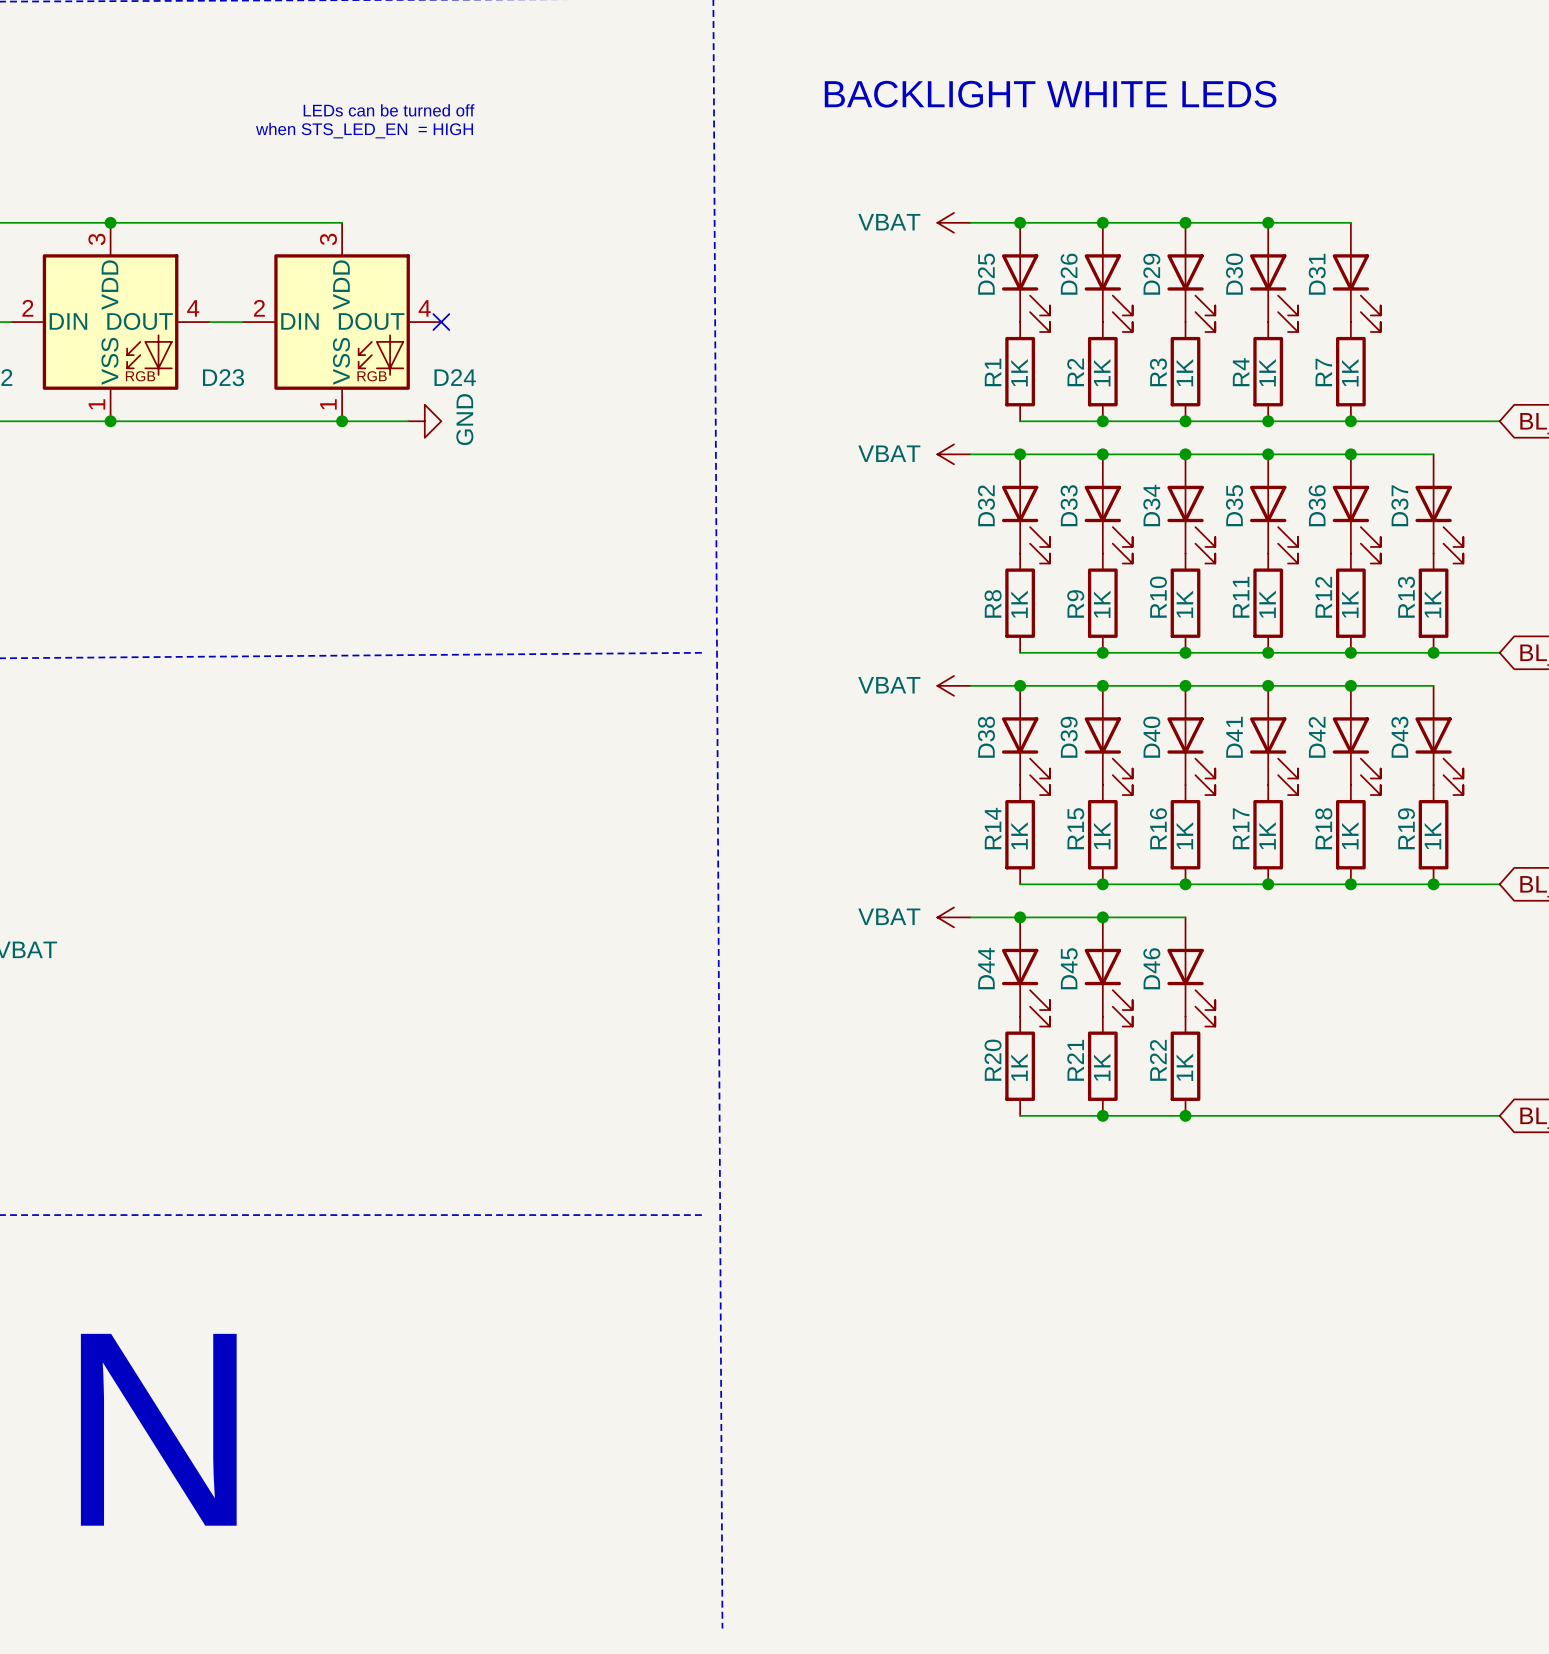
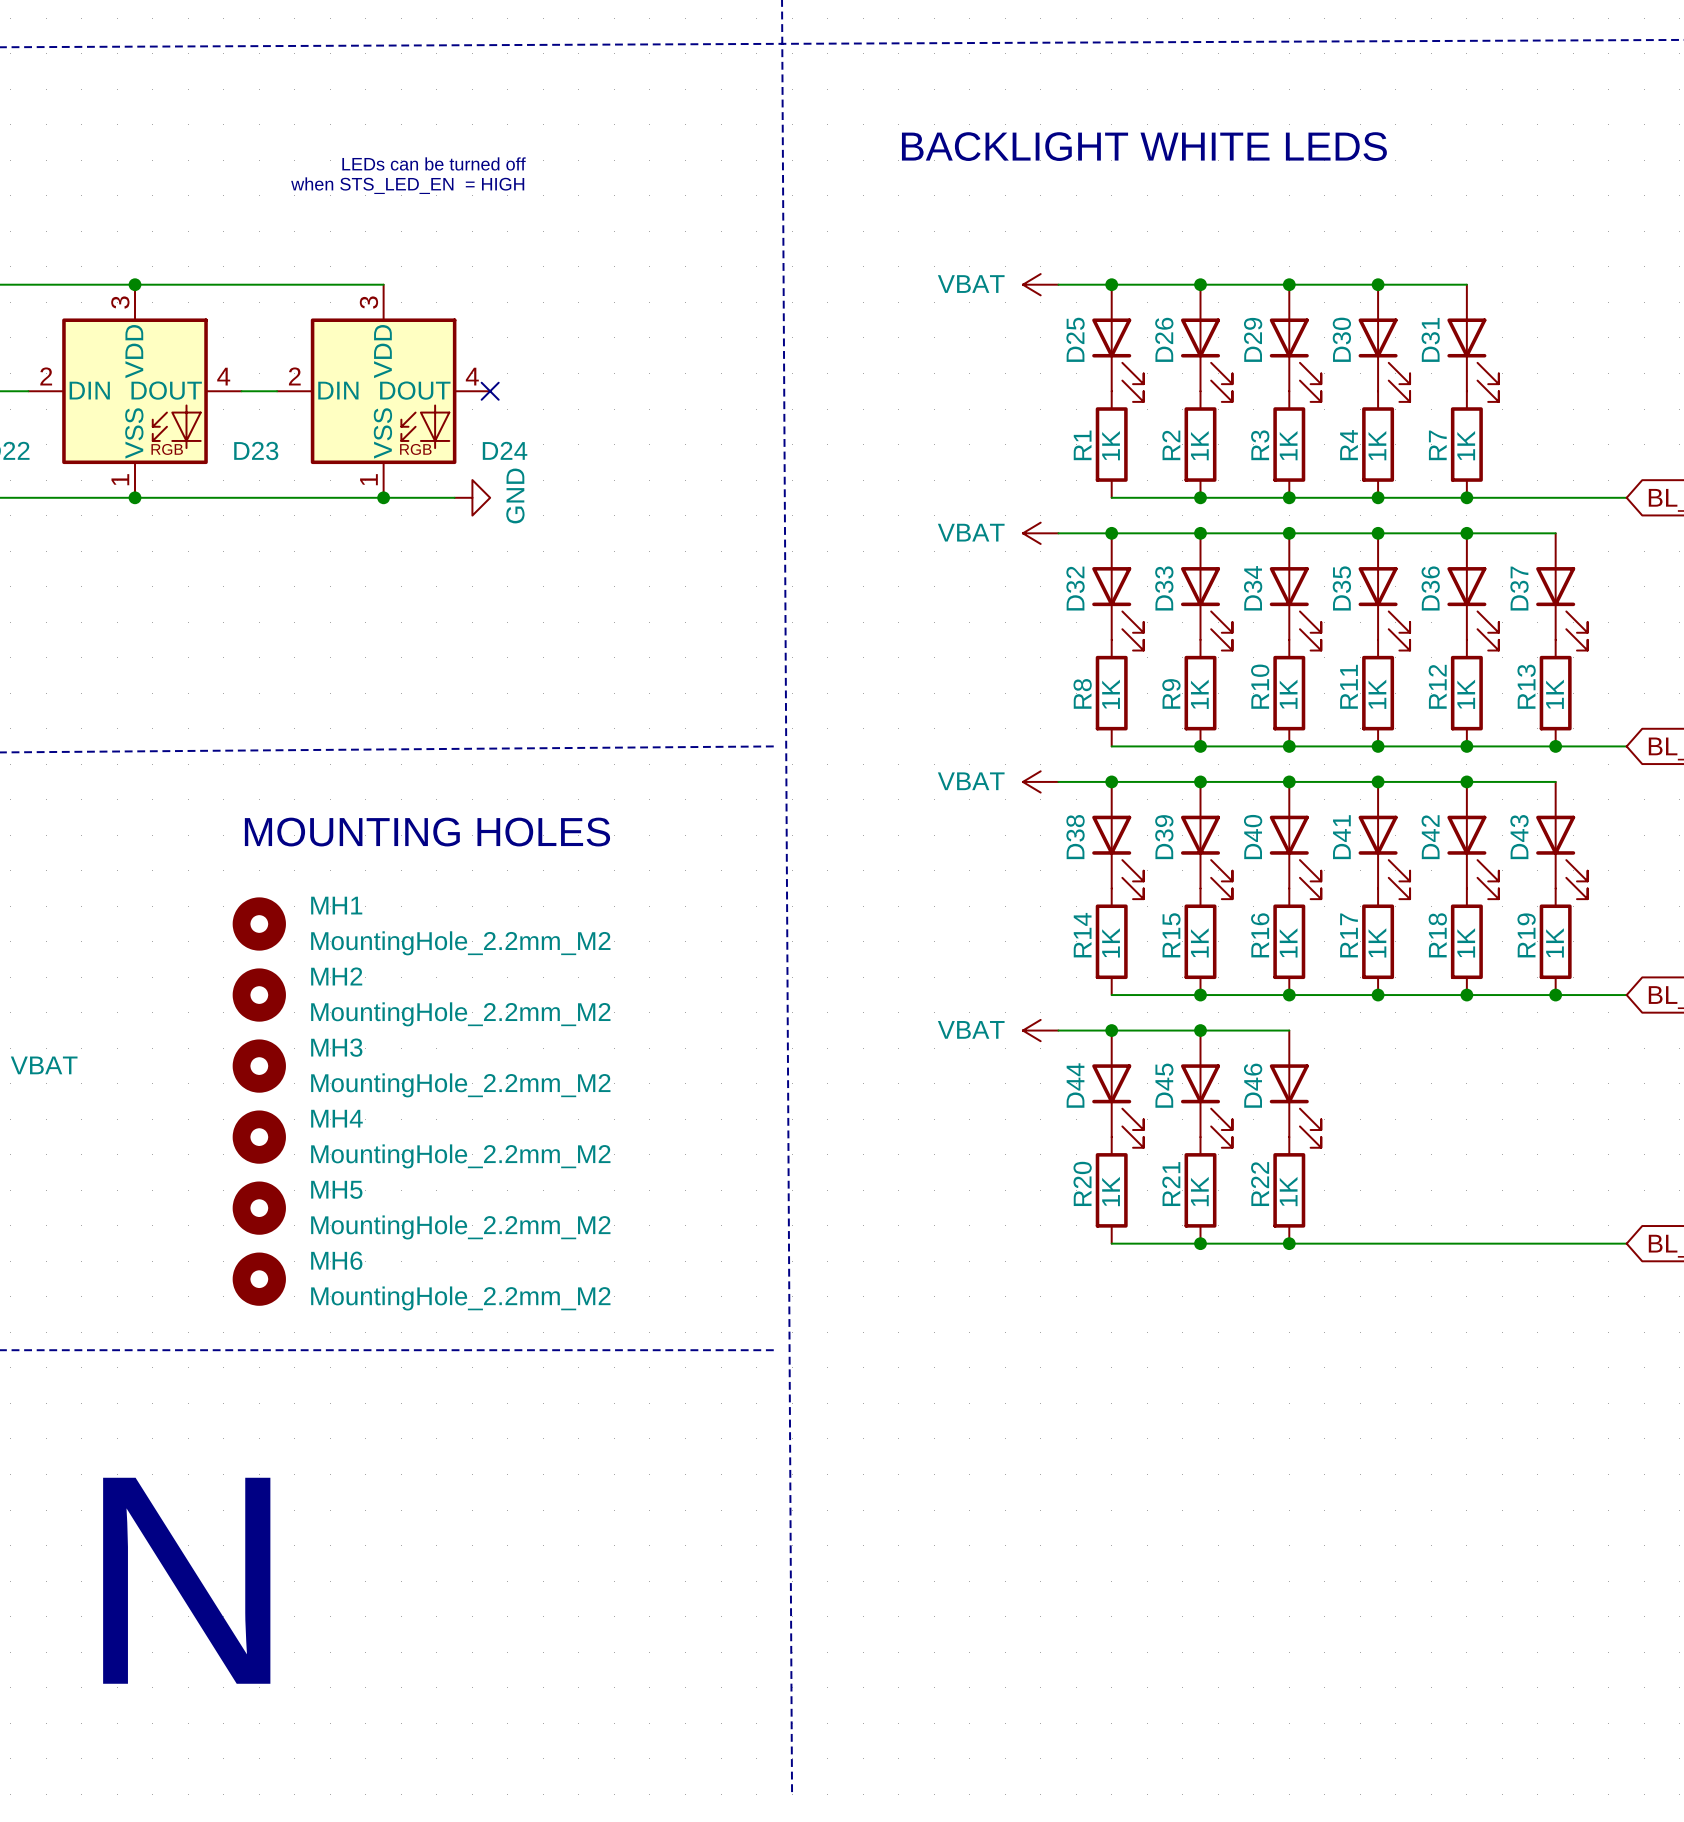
text: none -> MOUNTING HOLES (427, 832)
MH1: none -> MountingHole_2.2mm_M2 (259, 924)
MH2: none -> MountingHole_2.2mm_M2 (259, 995)
MH3: none -> MountingHole_2.2mm_M2 (259, 1066)
MH4: none -> MountingHole_2.2mm_M2 (259, 1137)
MH5: none -> MountingHole_2.2mm_M2 (259, 1208)
MH6: none -> MountingHole_2.2mm_M2 (259, 1279)

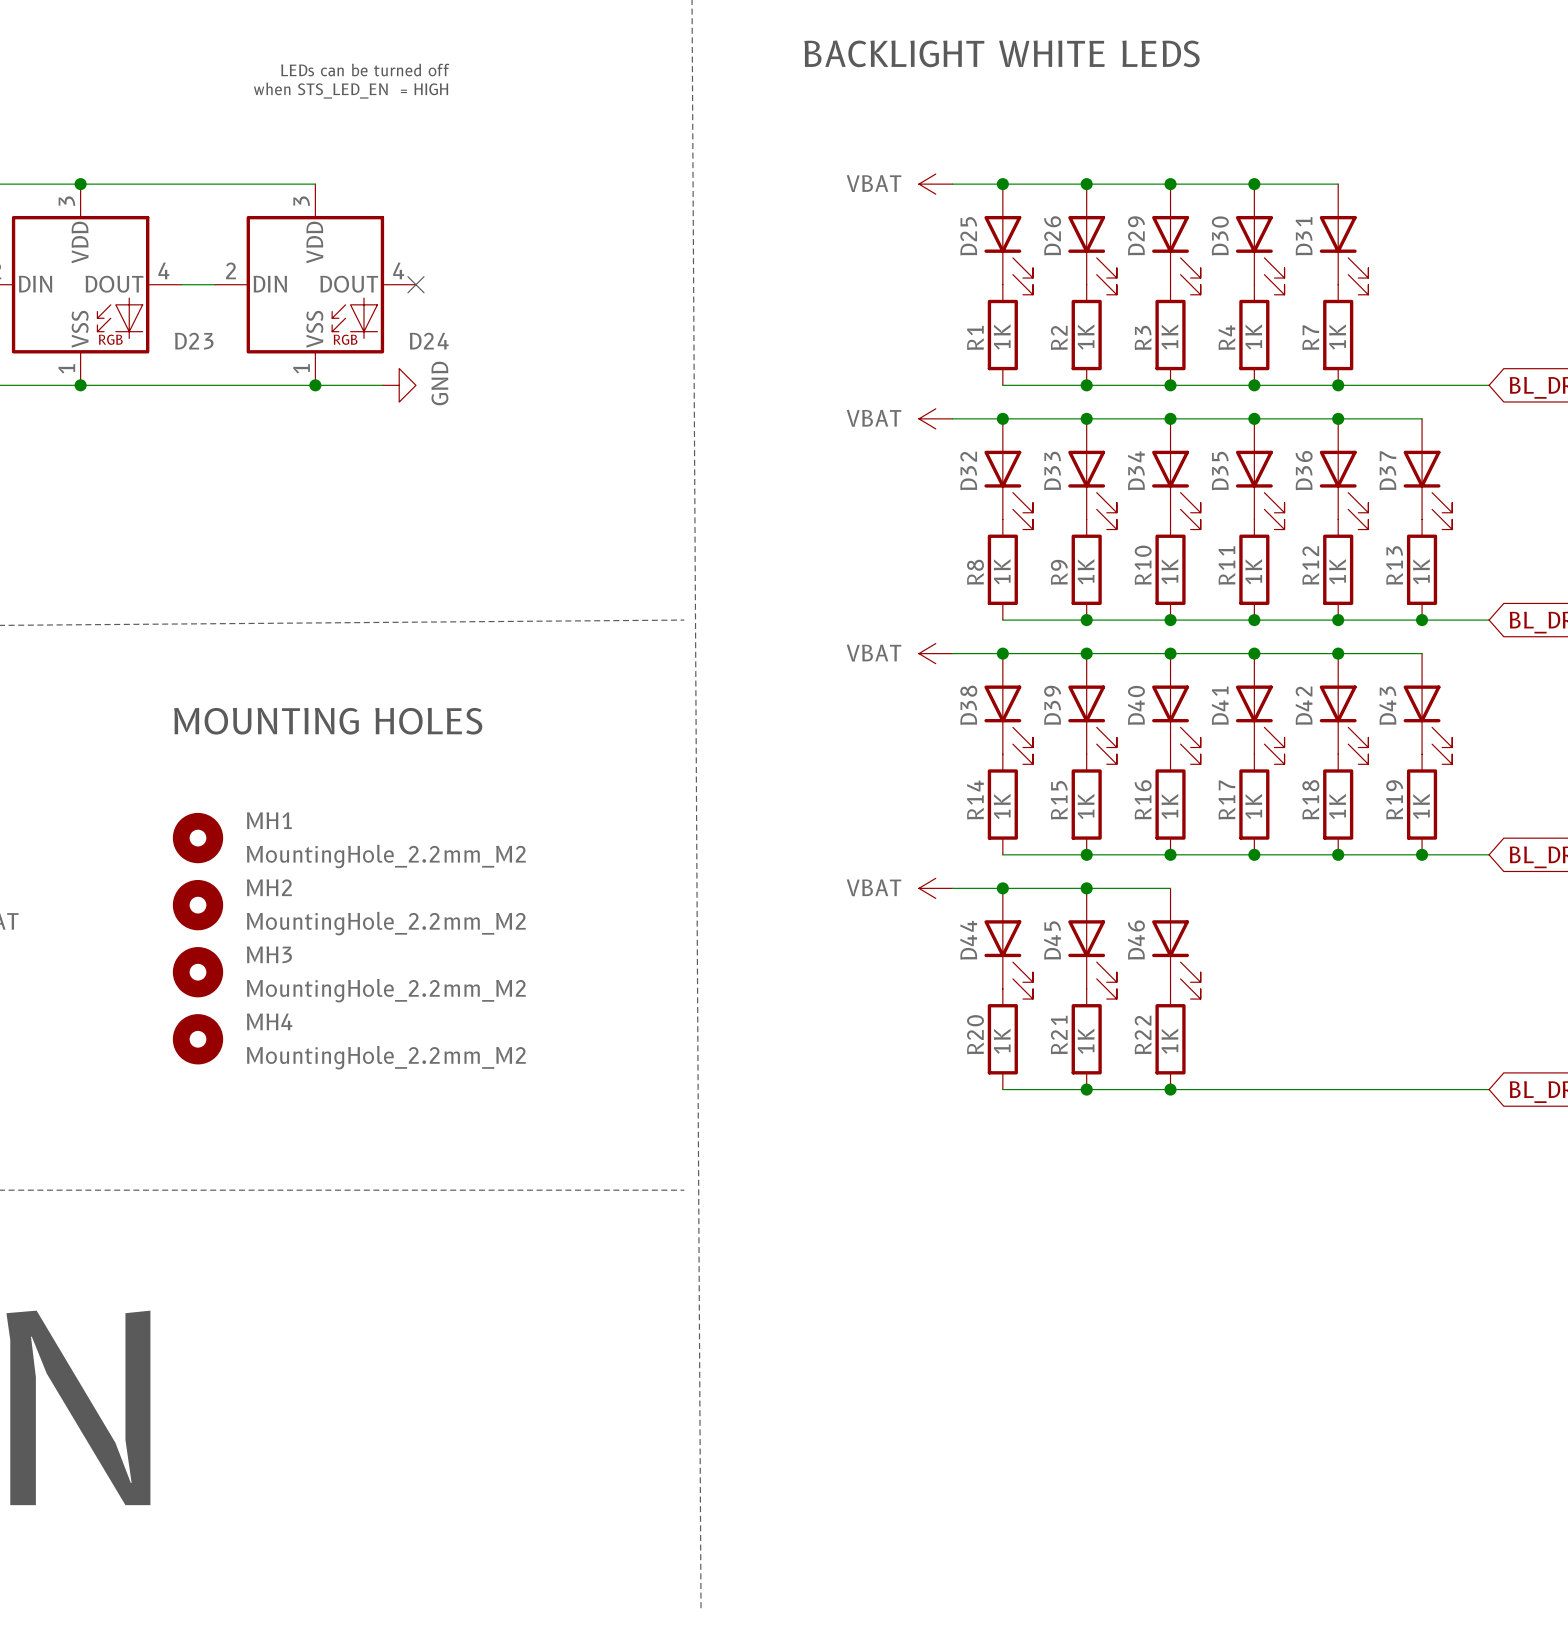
text position: MOUNTING HOLES (427, 832) -> MOUNTING HOLES (328, 721)
MH1 position: (259, 924) -> (197, 838)
MH2 position: (259, 995) -> (197, 905)
MH3 position: (259, 1066) -> (197, 972)
MH4 position: (259, 1137) -> (197, 1039)
MH5: MountingHole_2.2mm_M2 (259, 1208) -> none
MH6: MountingHole_2.2mm_M2 (259, 1279) -> none

